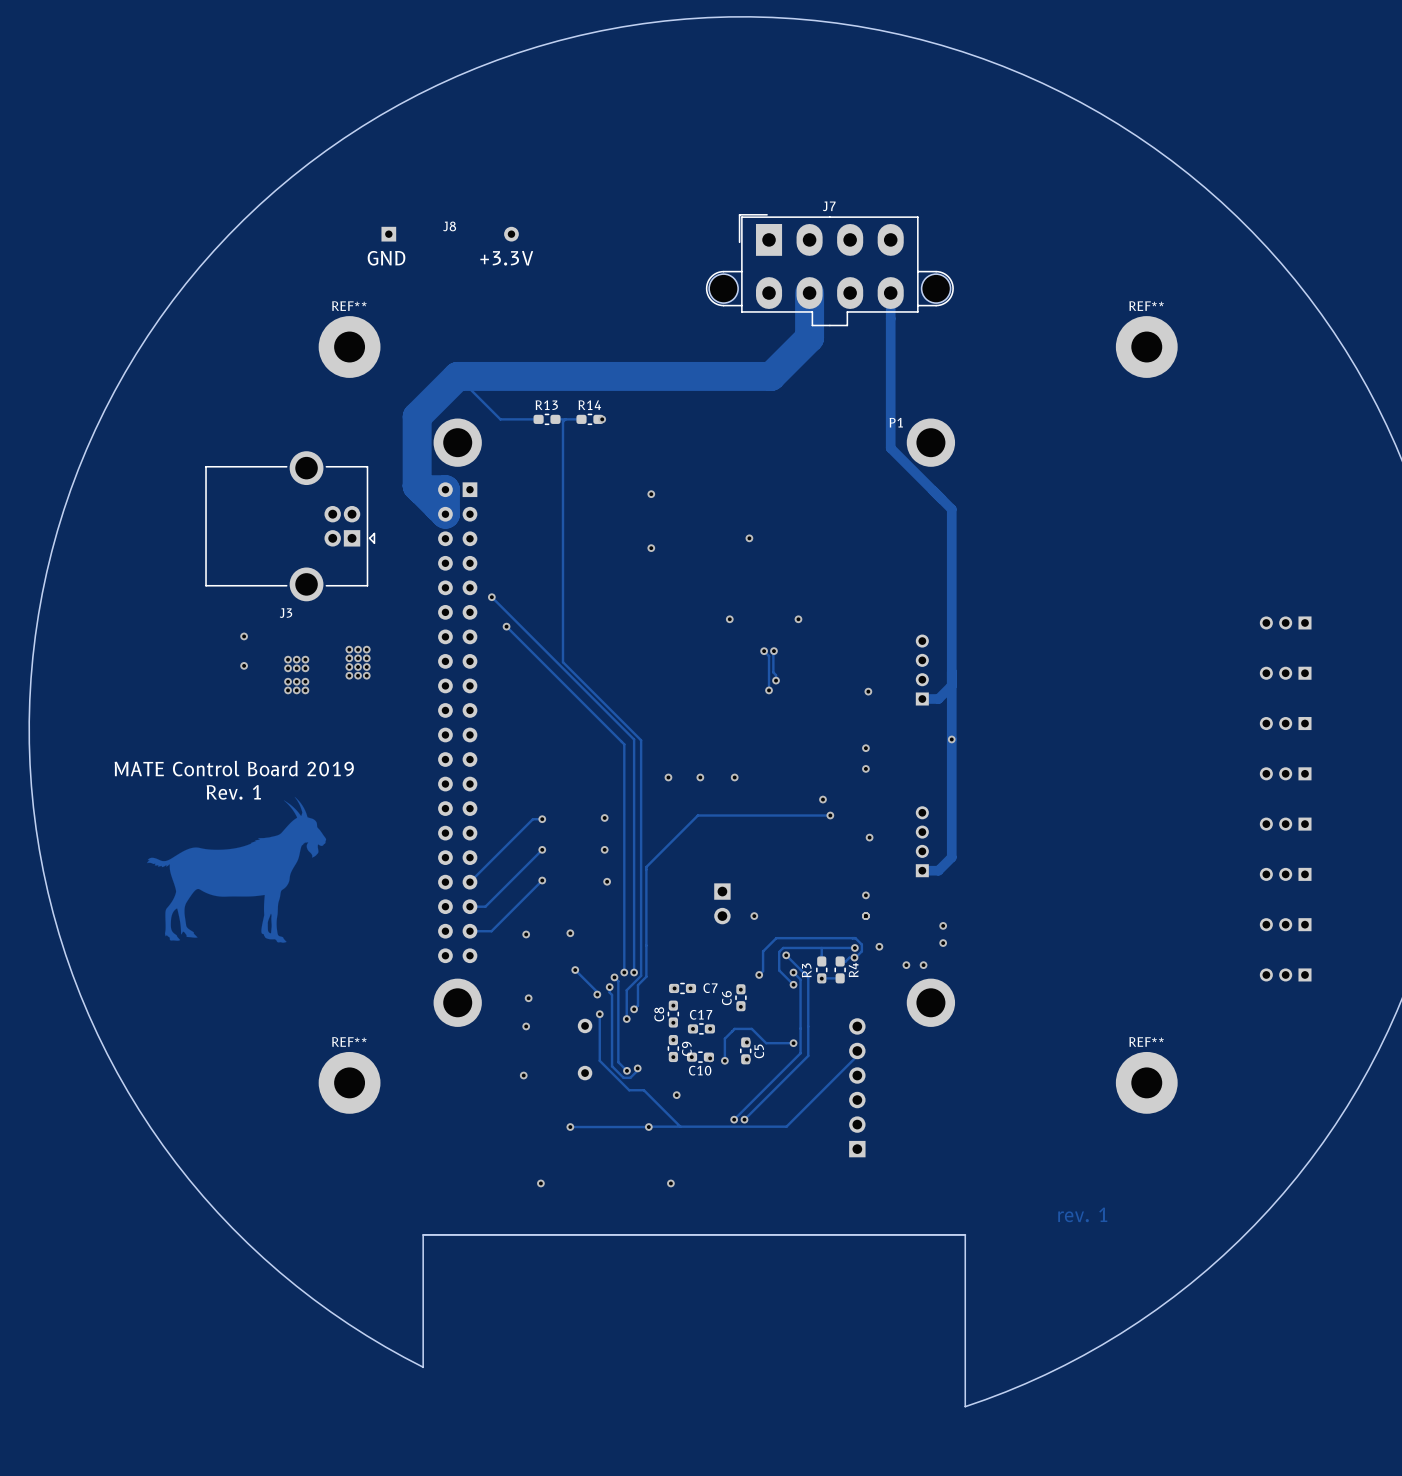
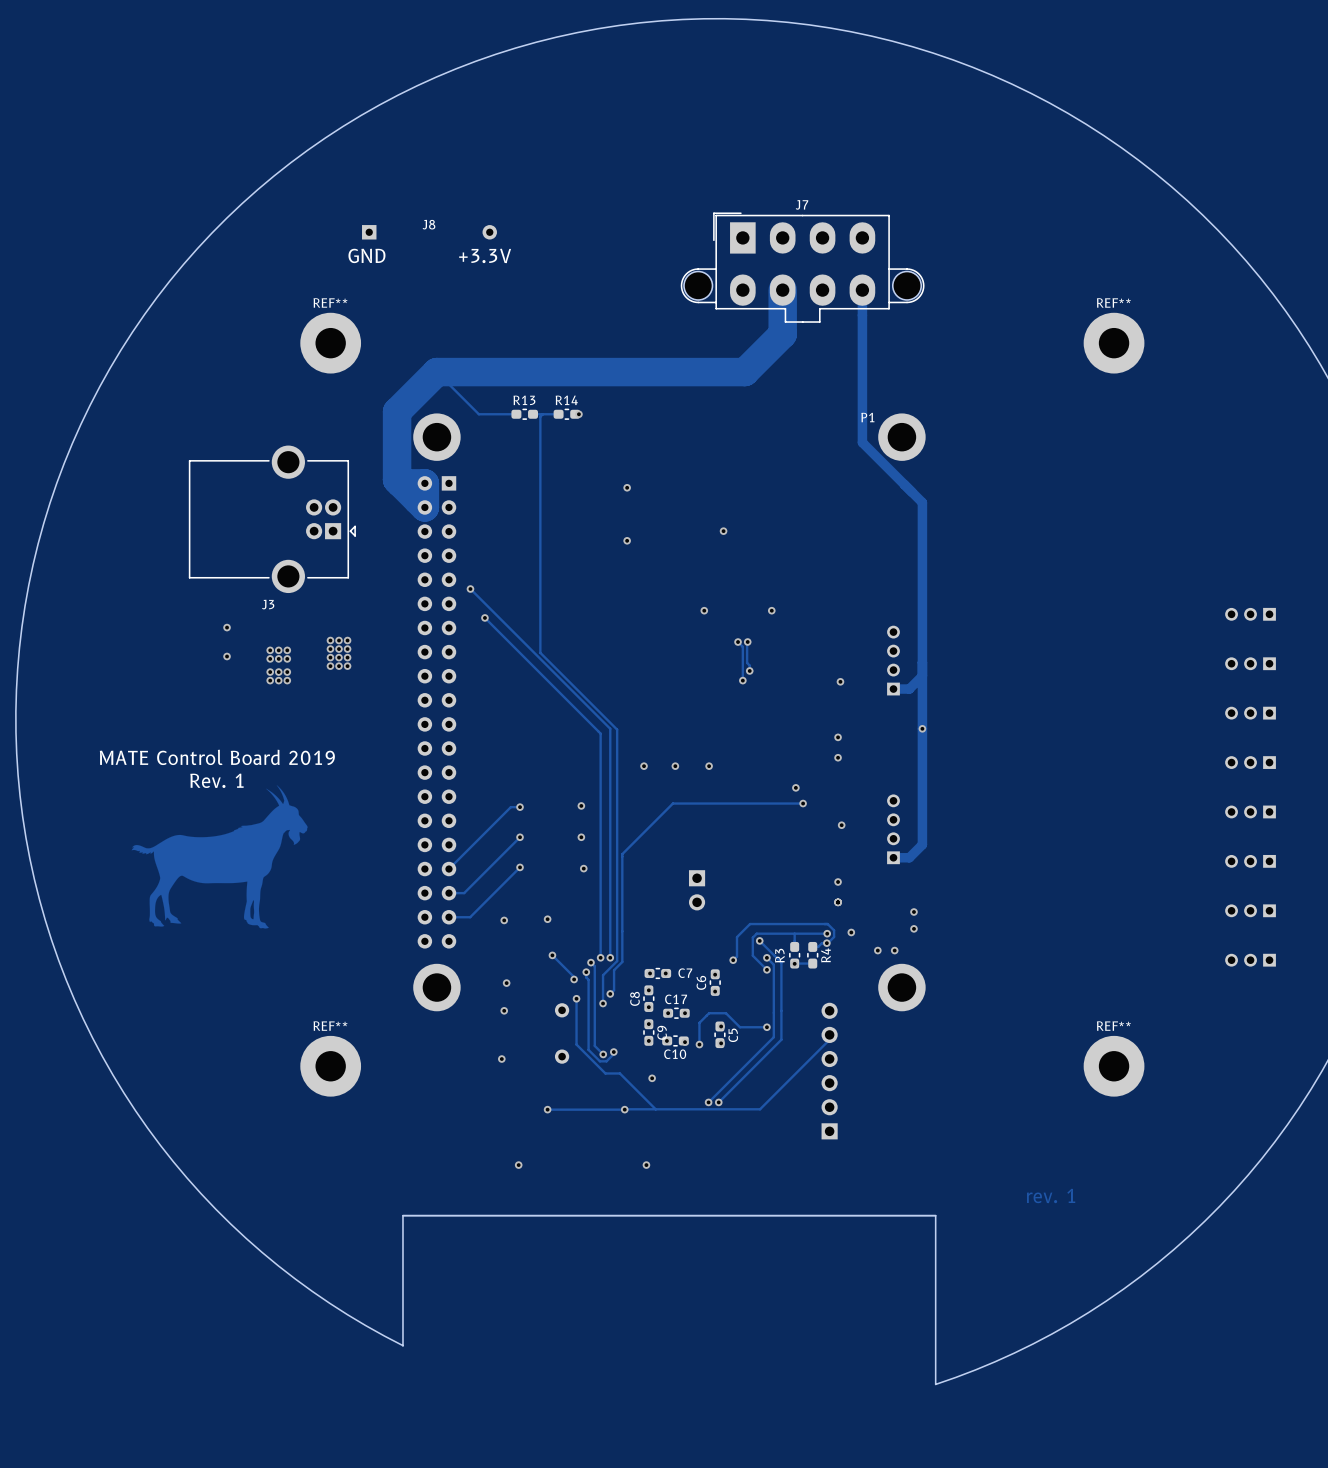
via: (754, 916) -> none

